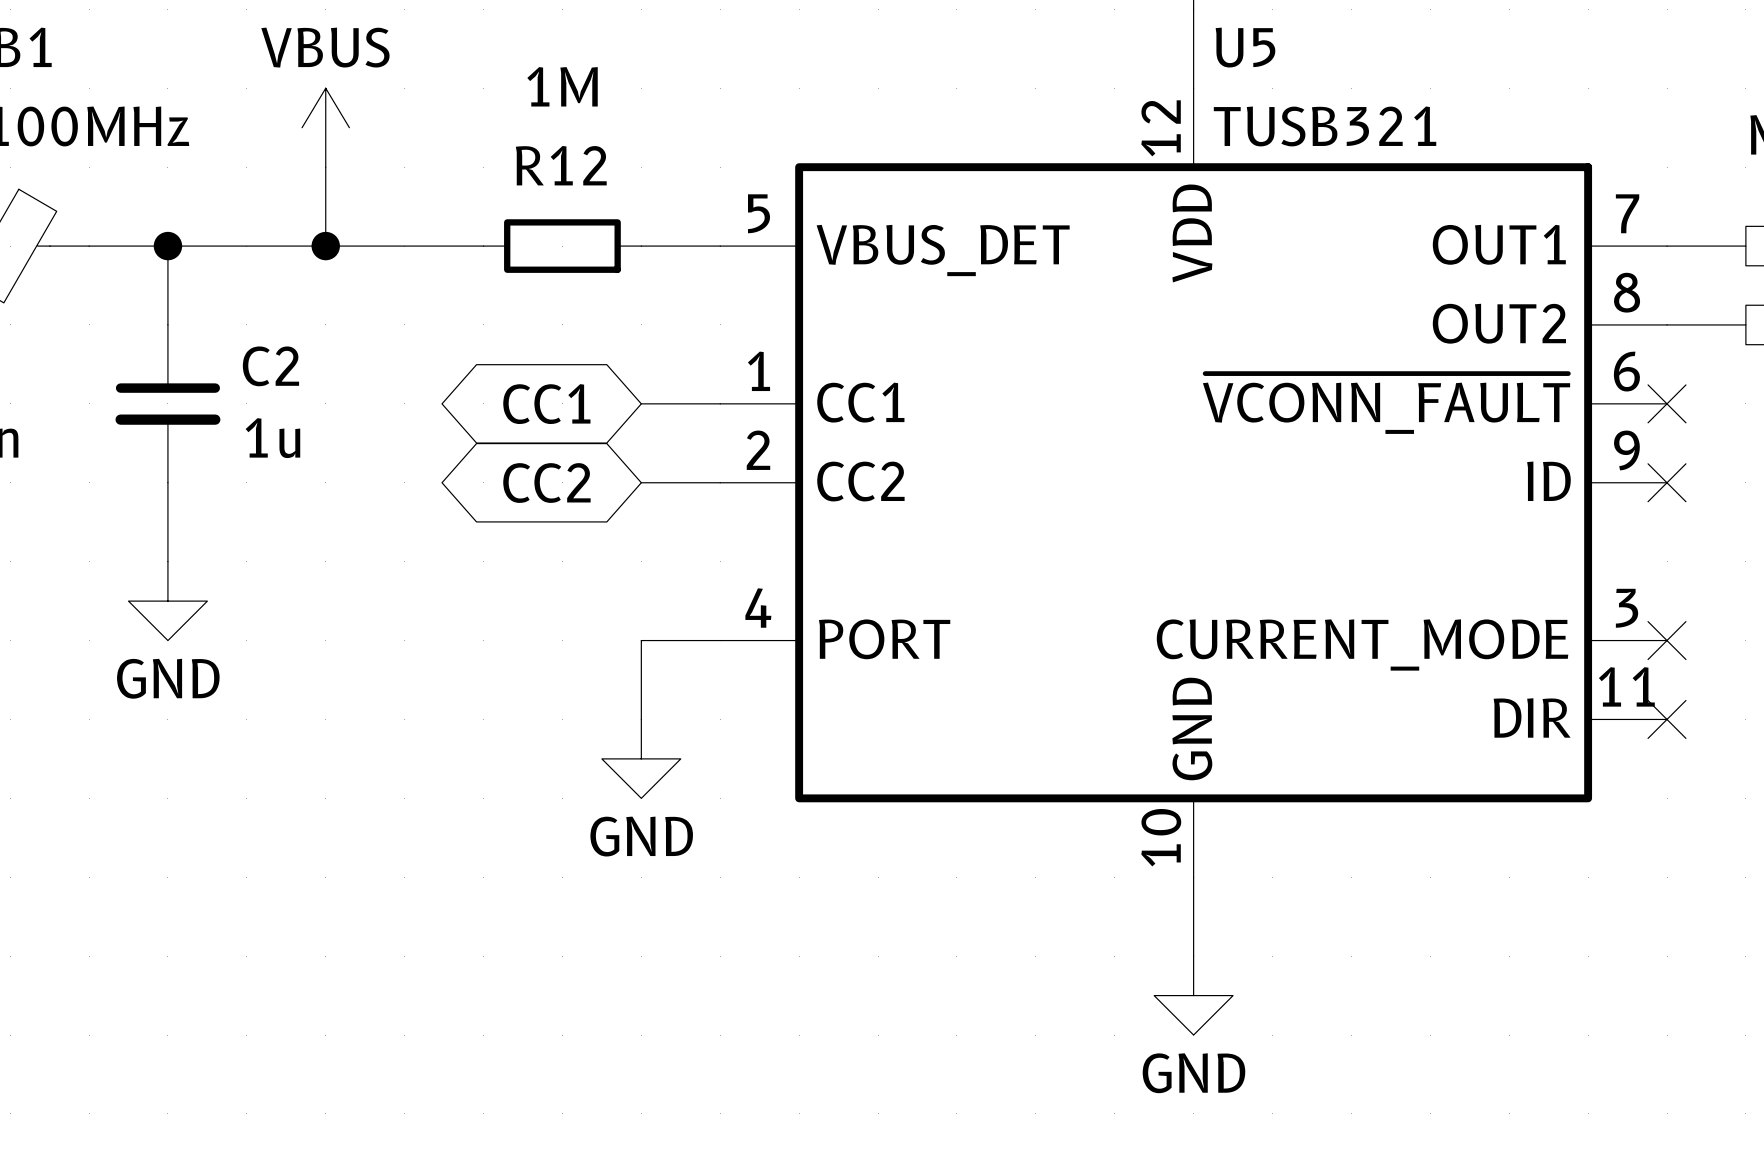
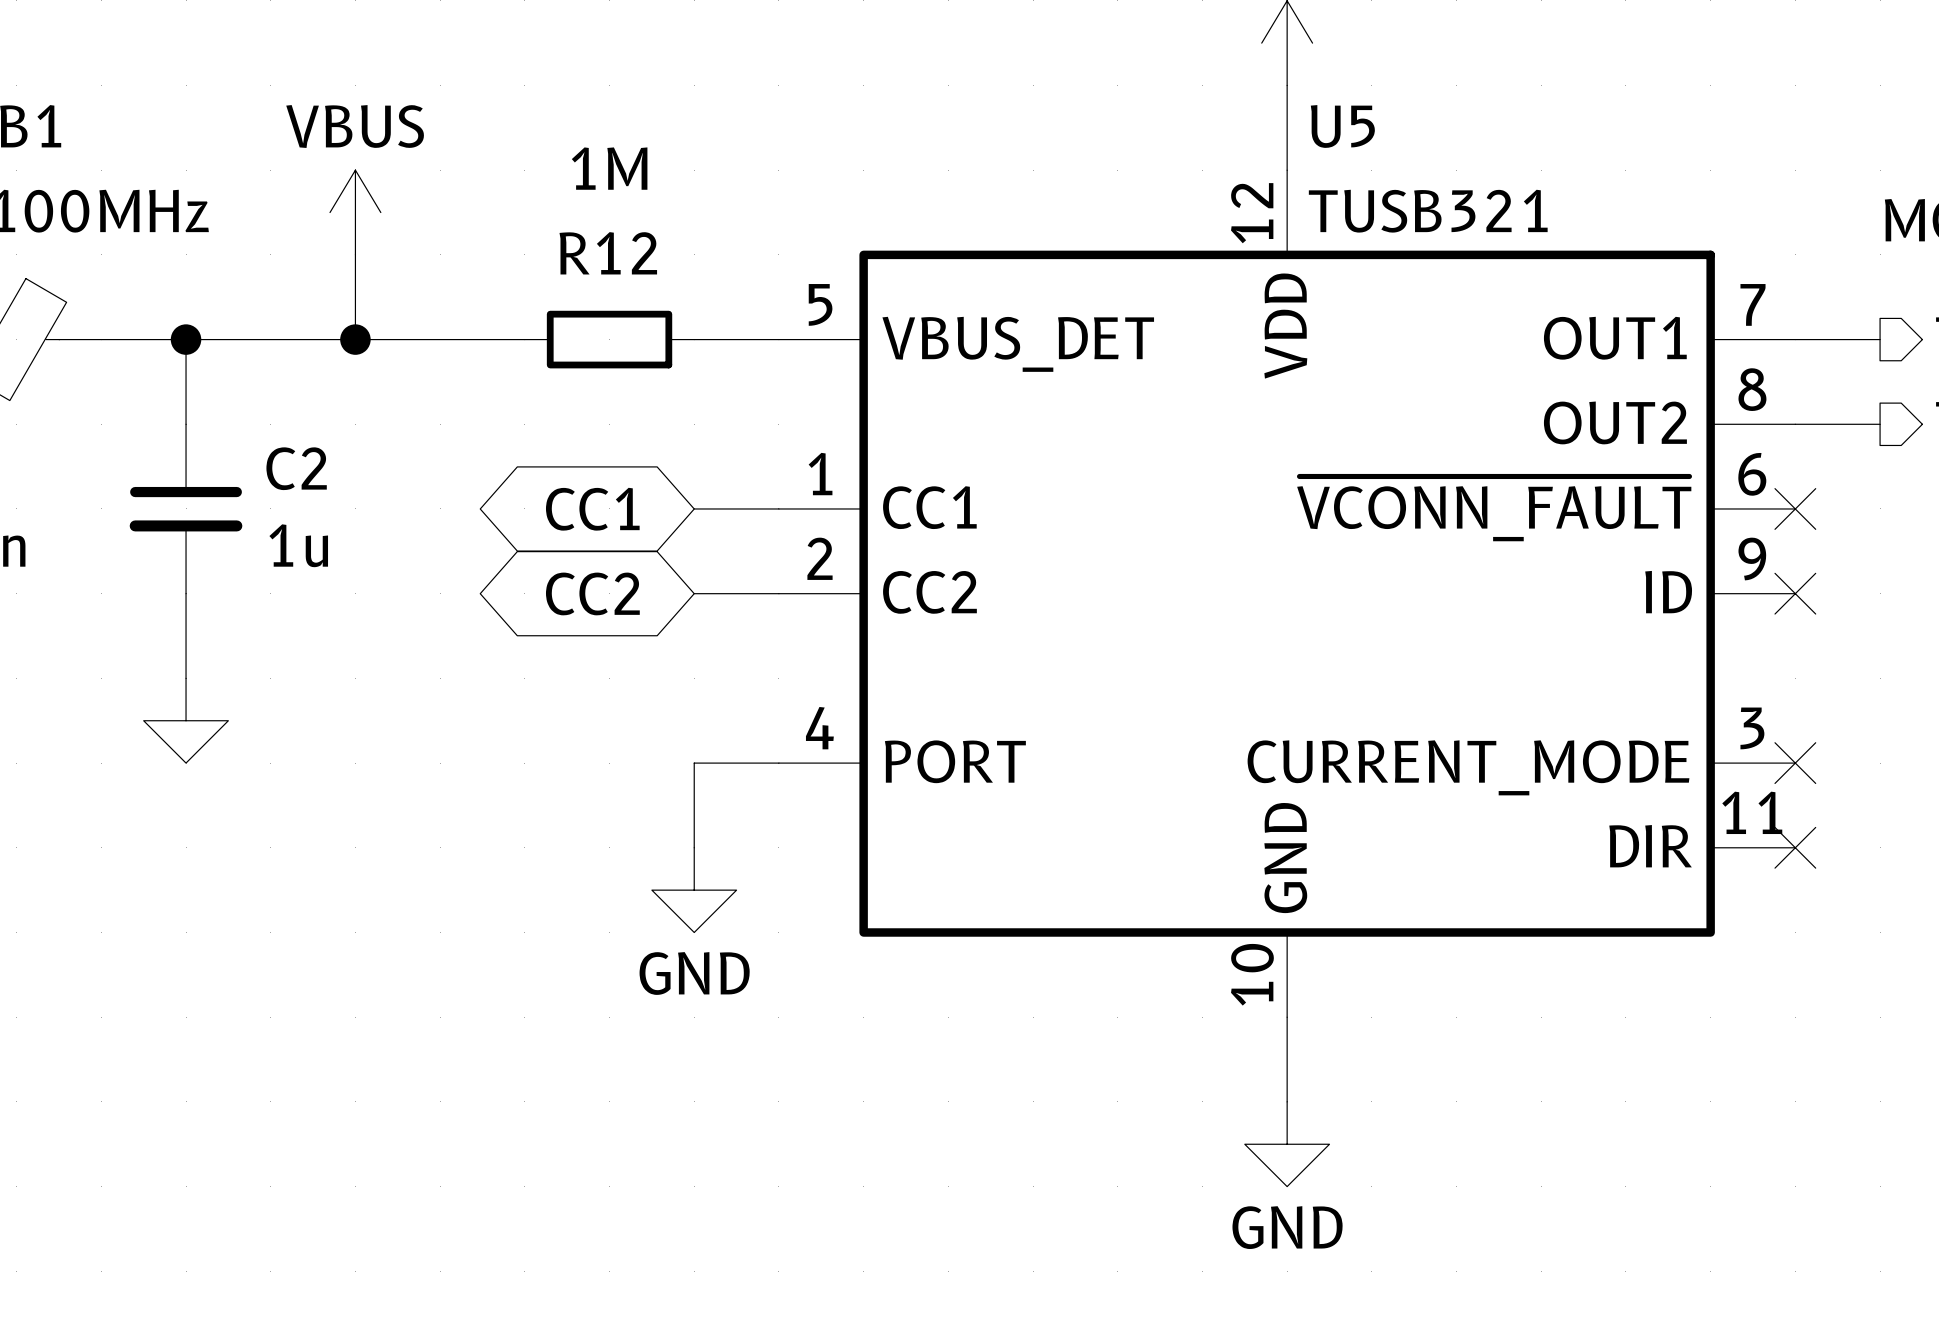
power symbol text: GND (168, 678) -> none

